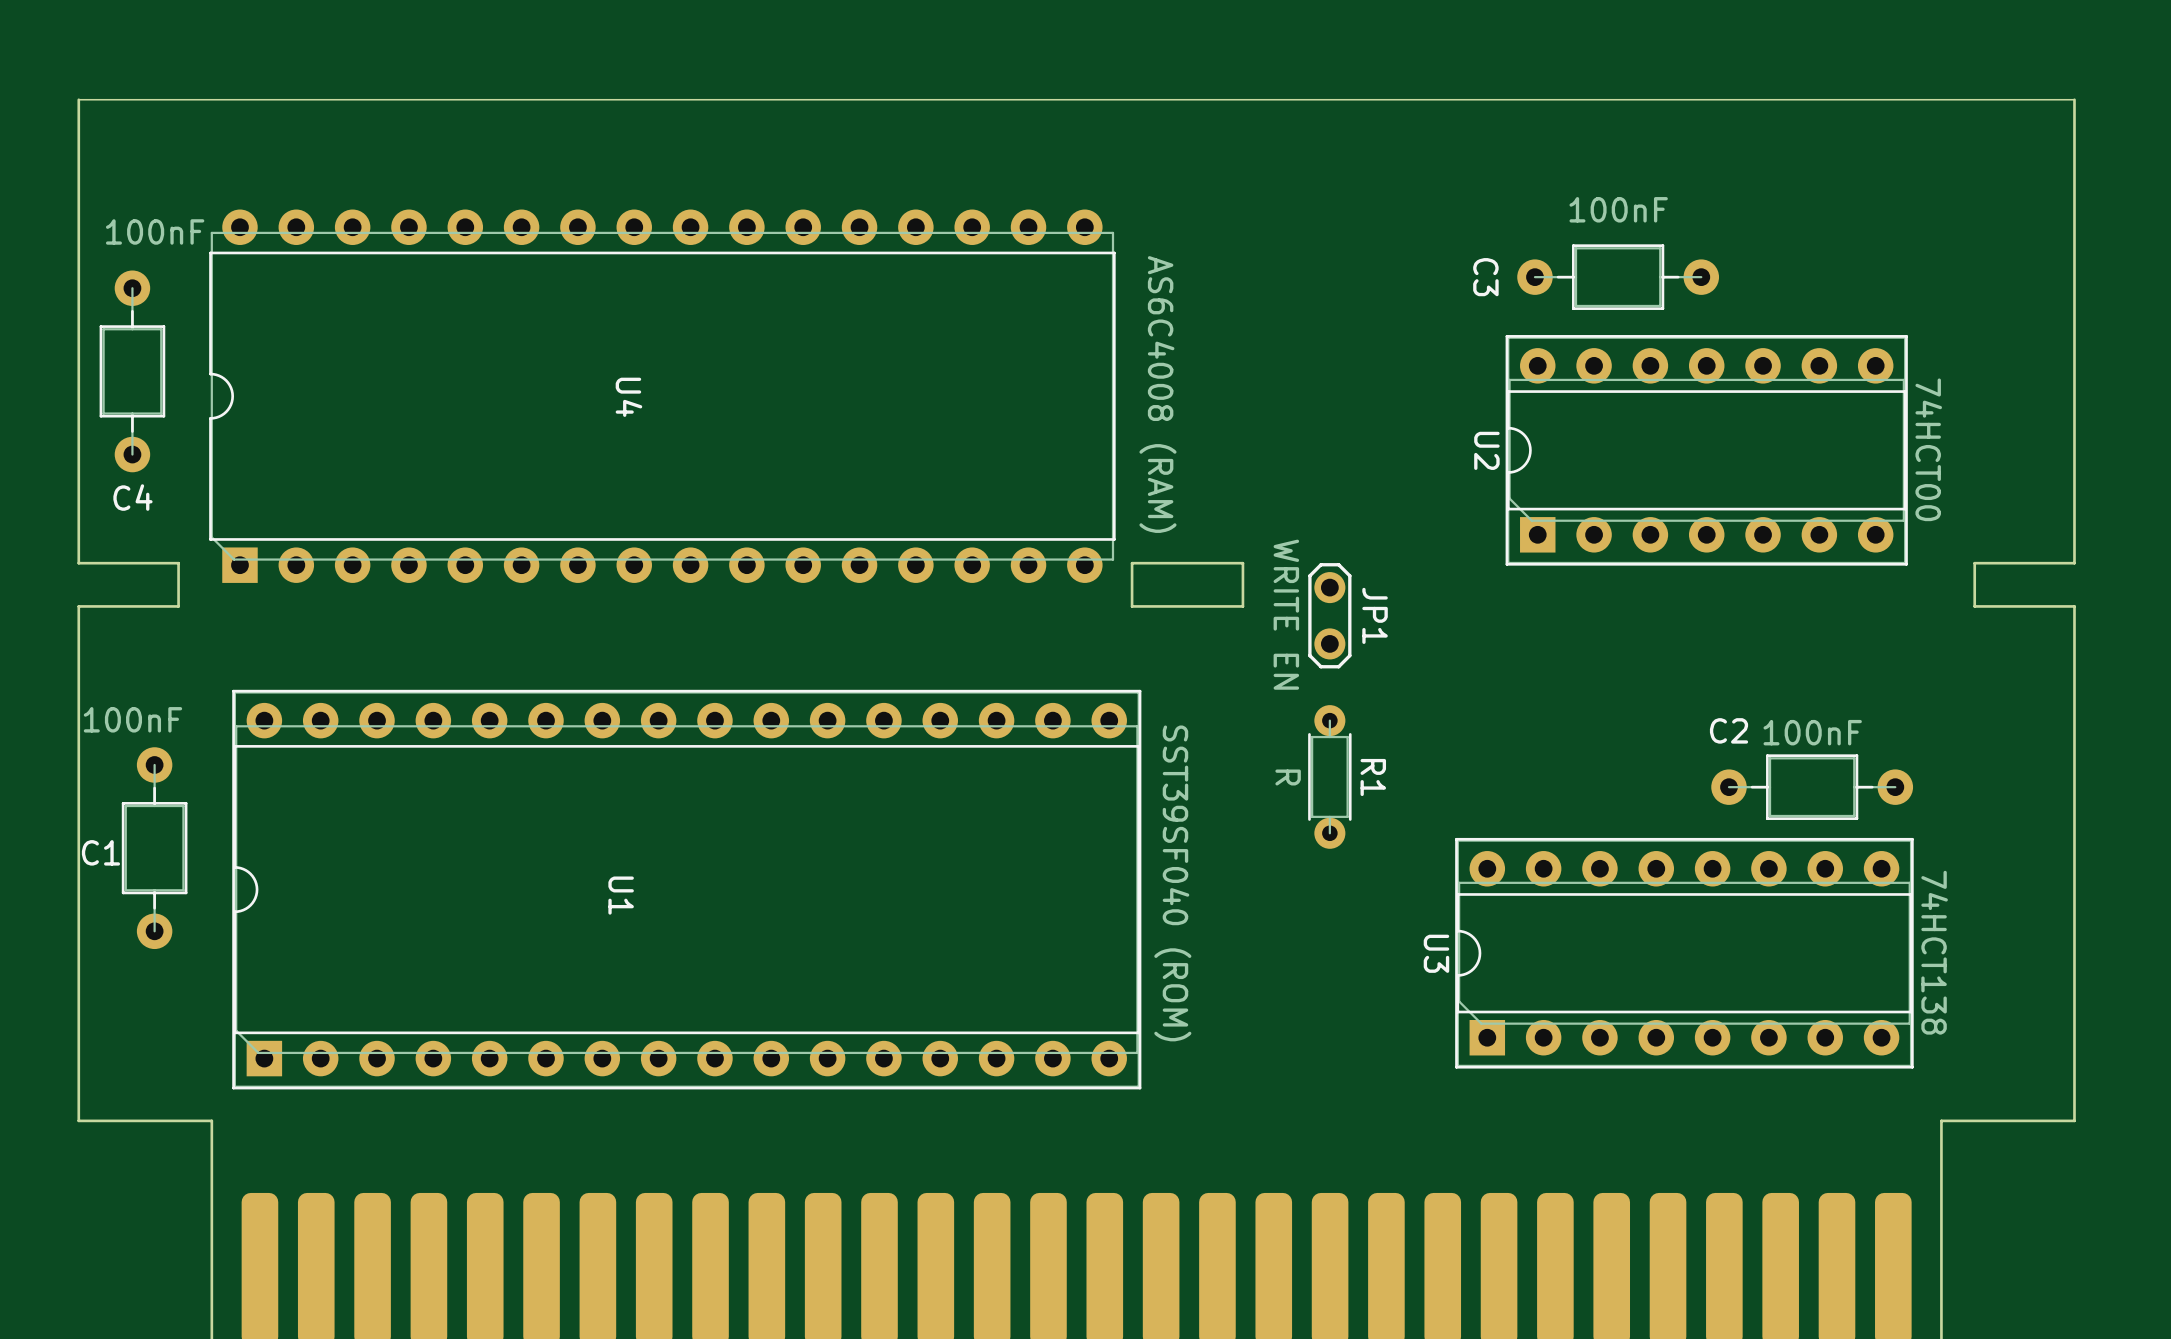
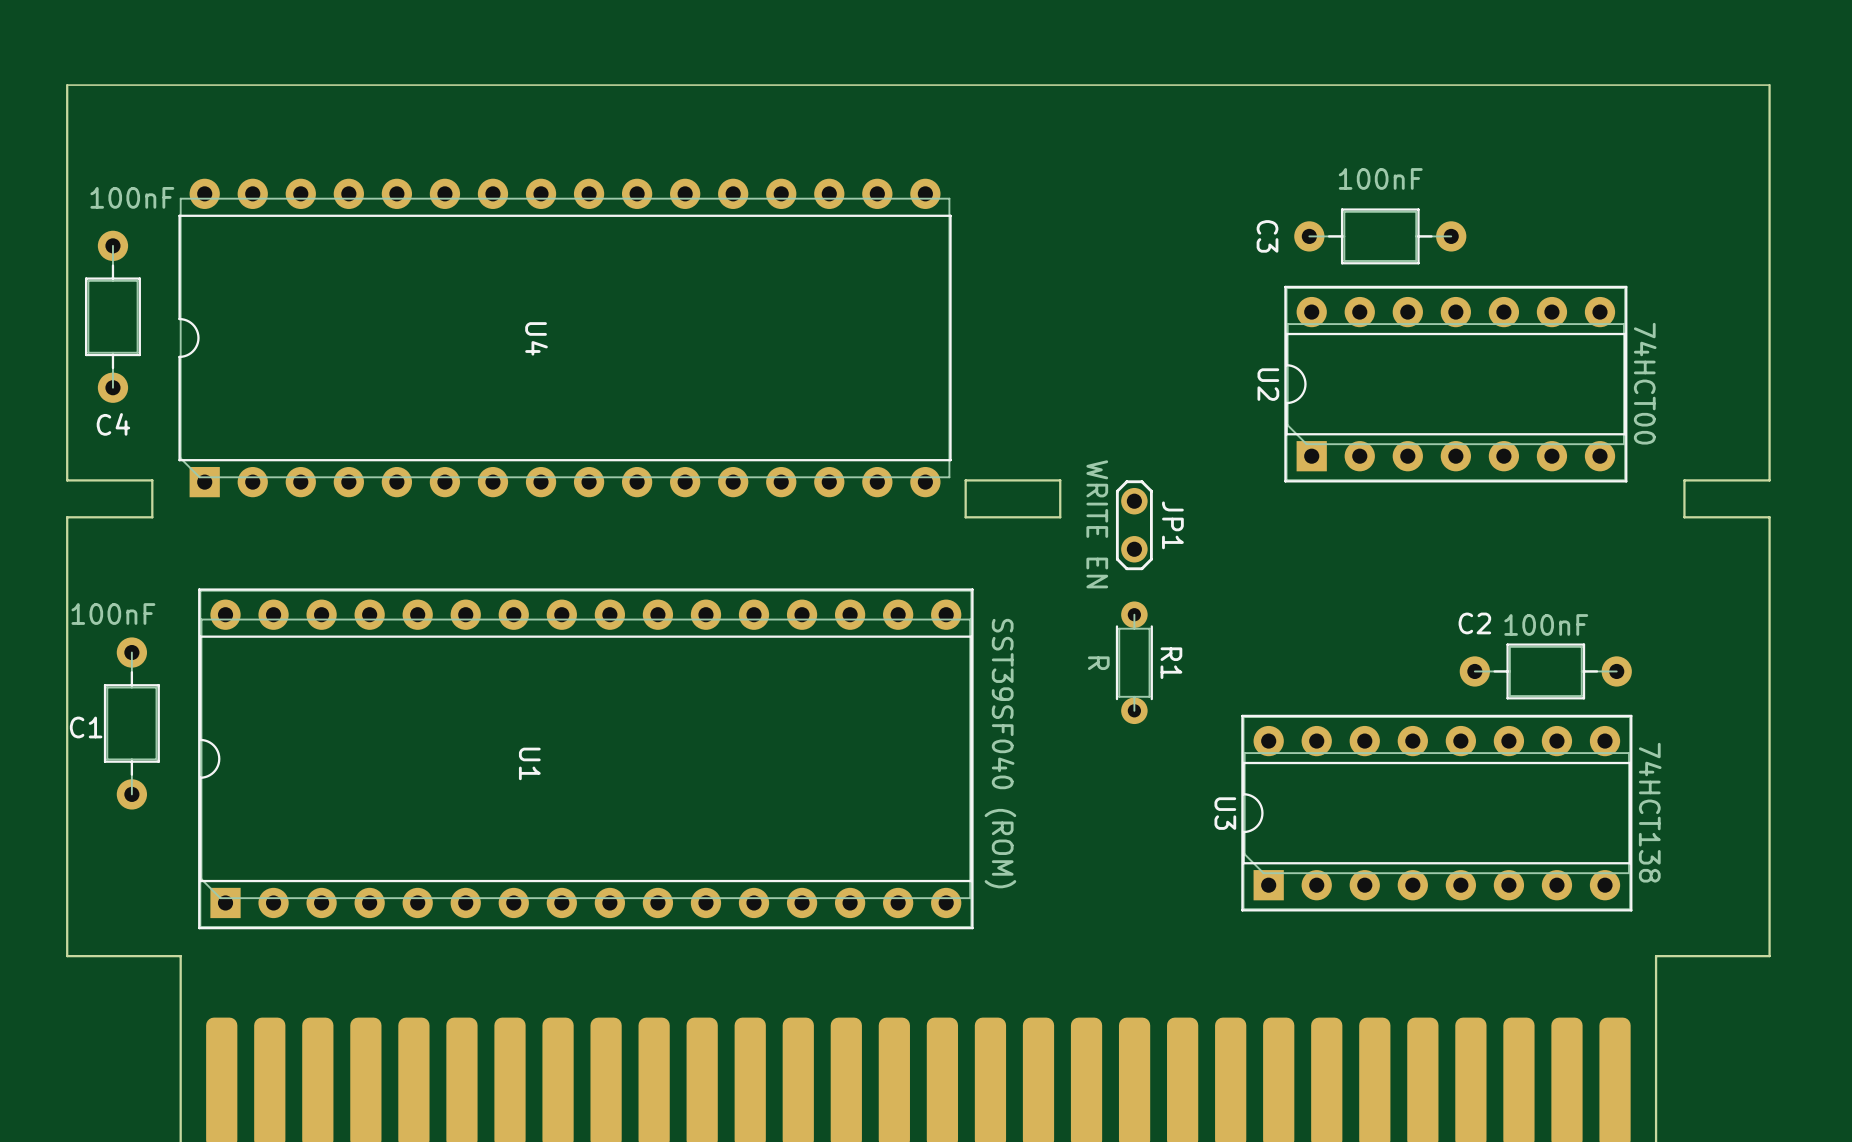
U4 value: AS6C4008 (RAM) (1157, 394) -> none

